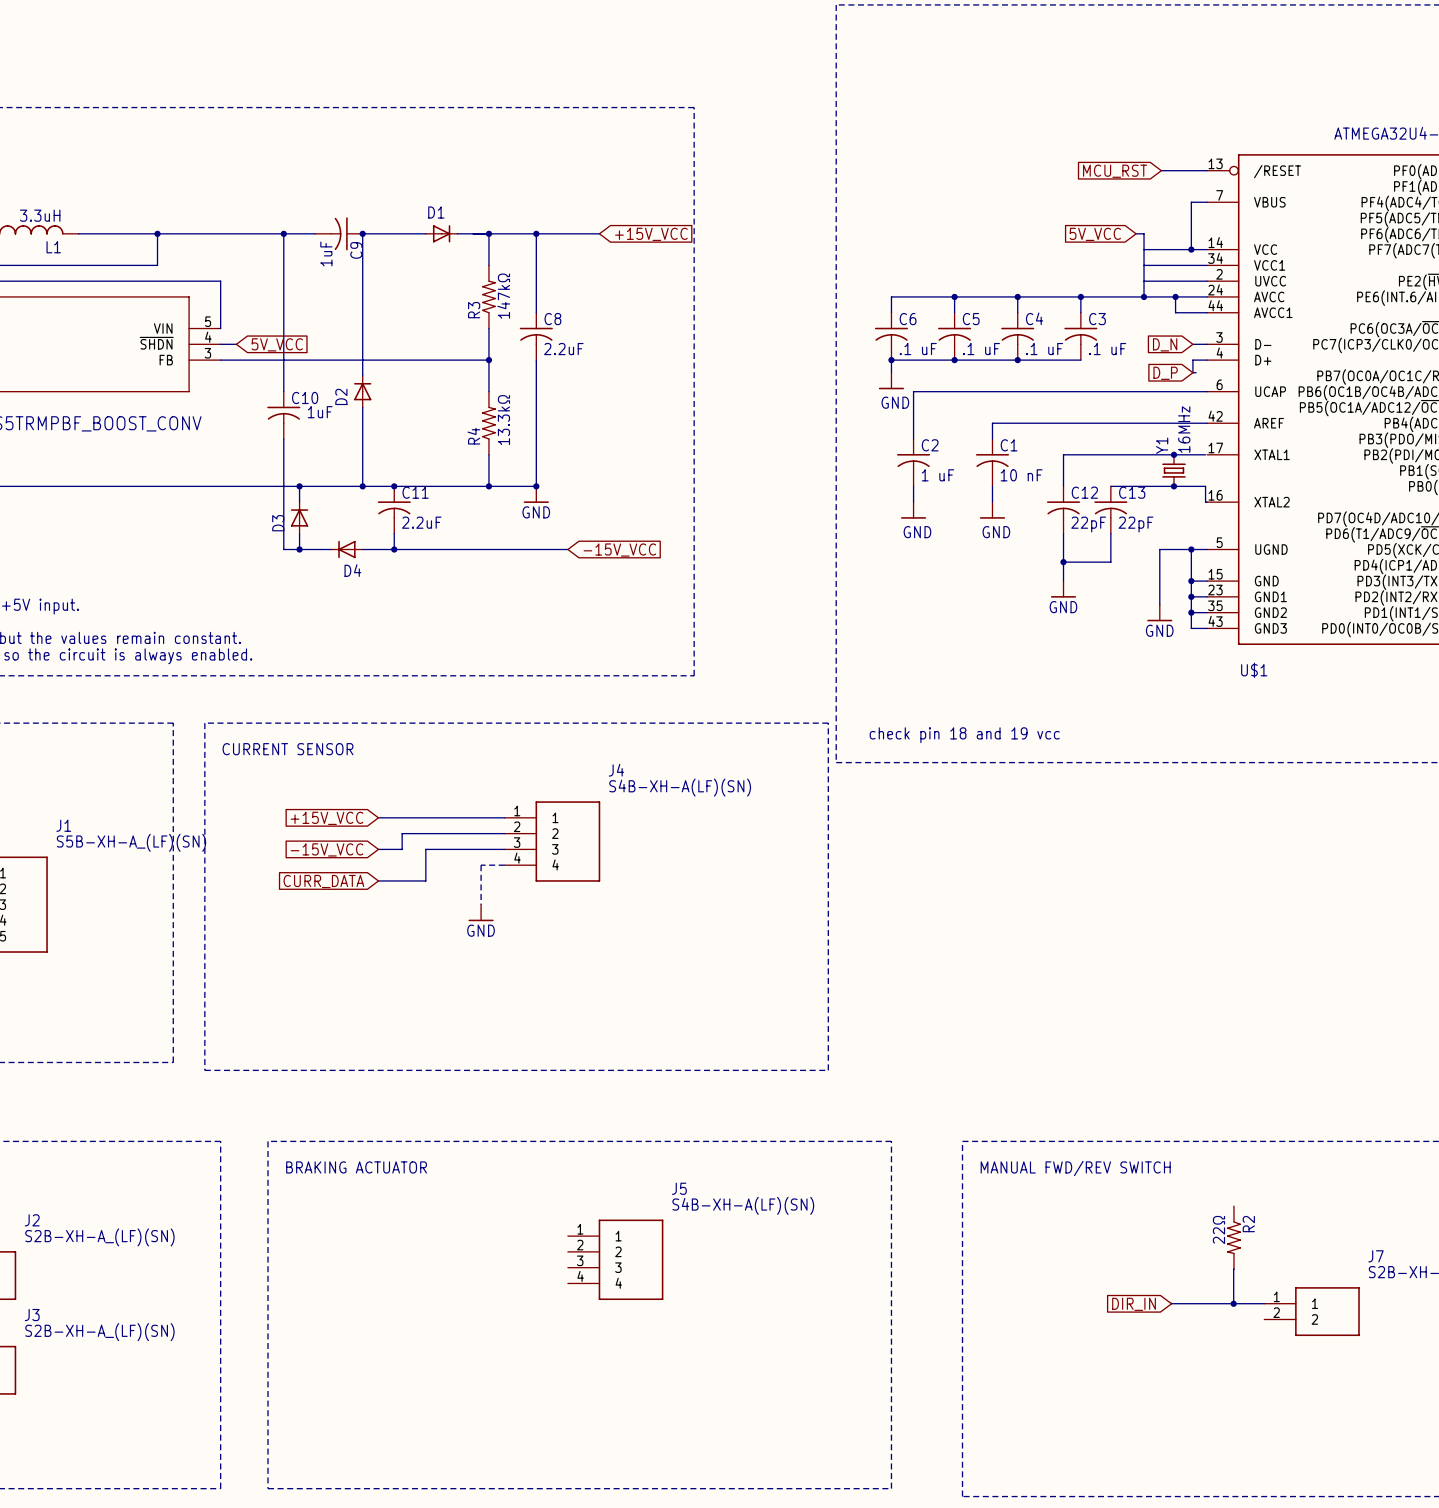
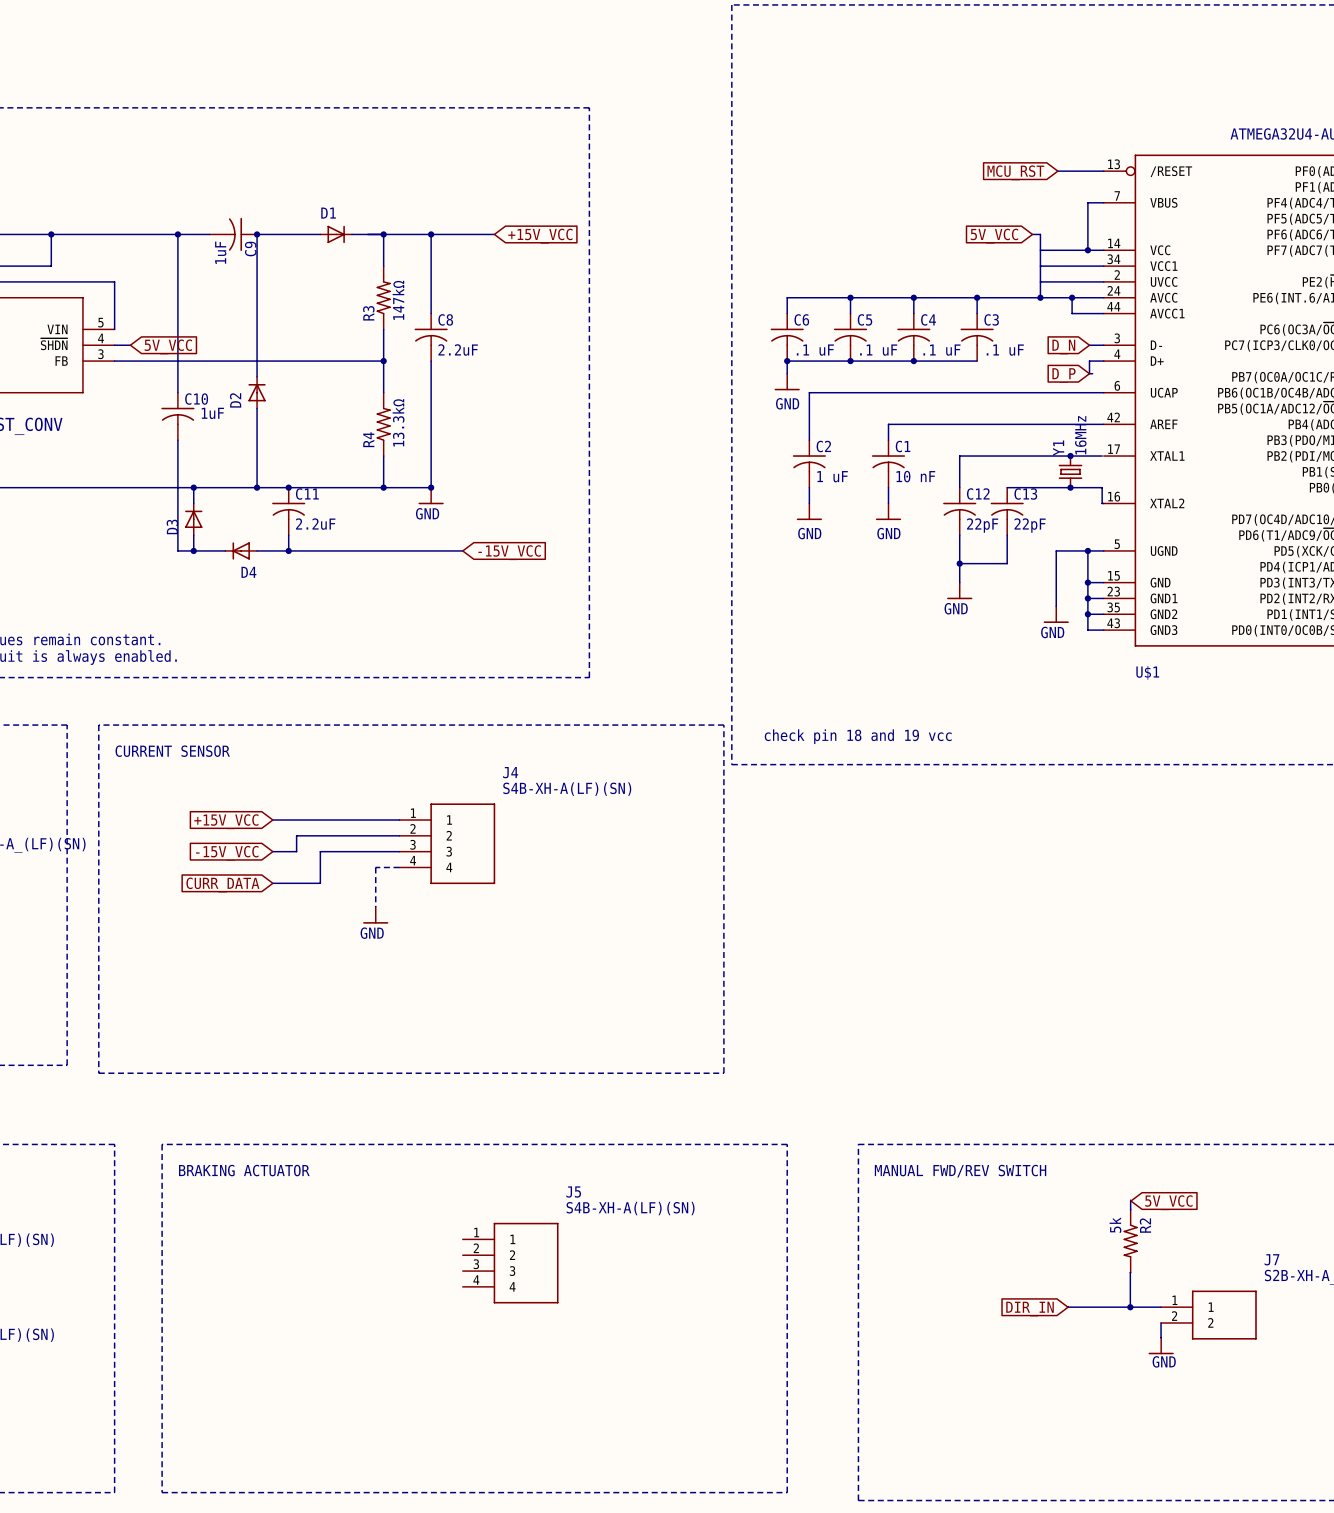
wire: none -> (1130, 1200) (1130, 1209)
global label: none -> 5V_VCC (1168, 1202)
R2 value: 22Ω (1218, 1229) -> 5k (1115, 1225)
wire: none -> (1161, 1322) (1161, 1337)
power symbol: none -> GND (1161, 1345)

